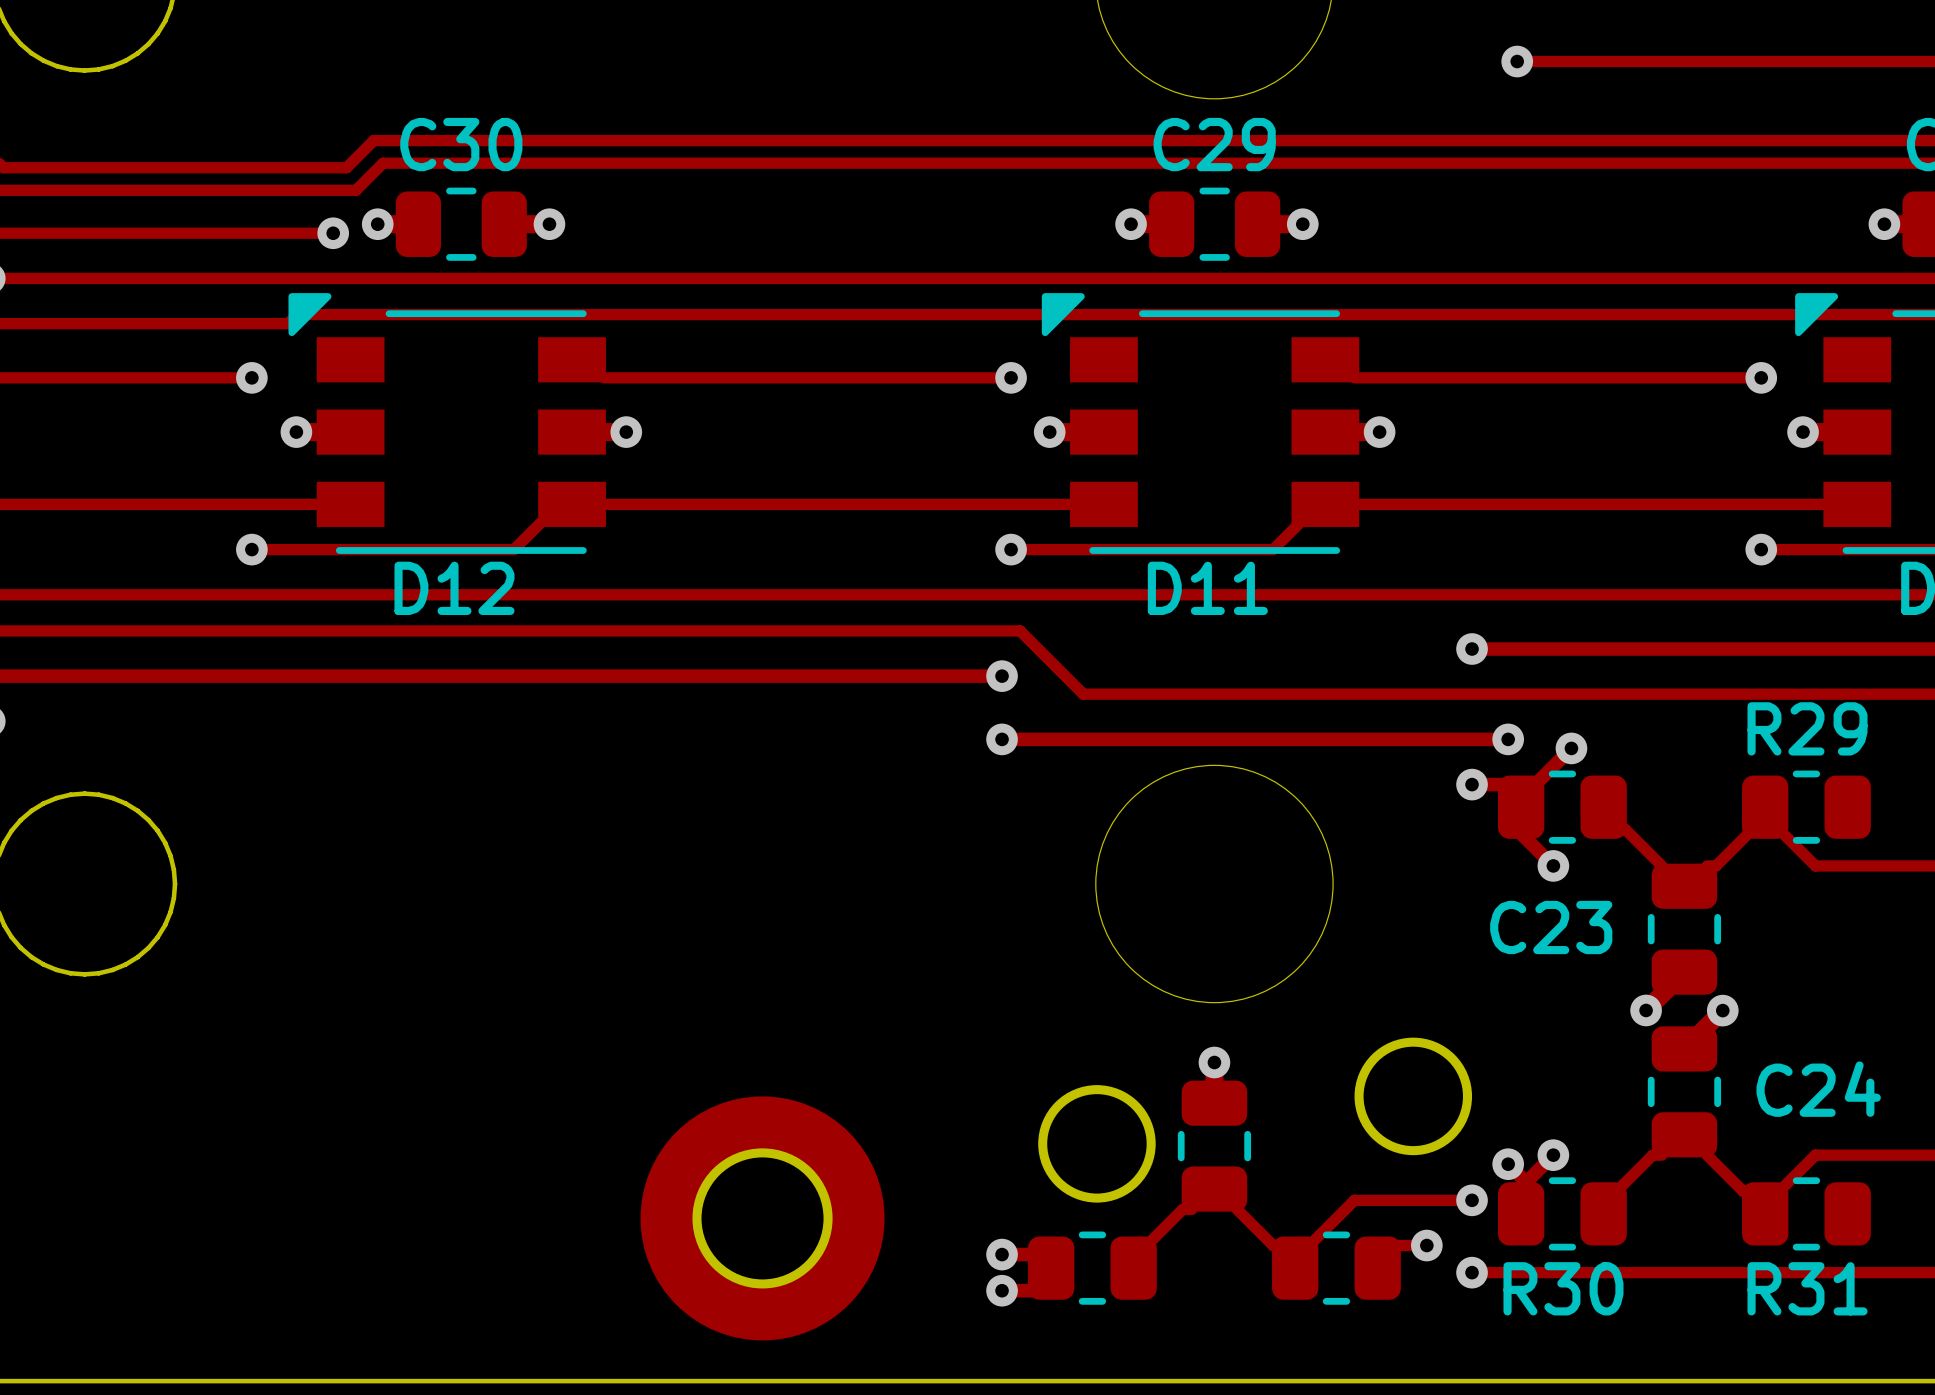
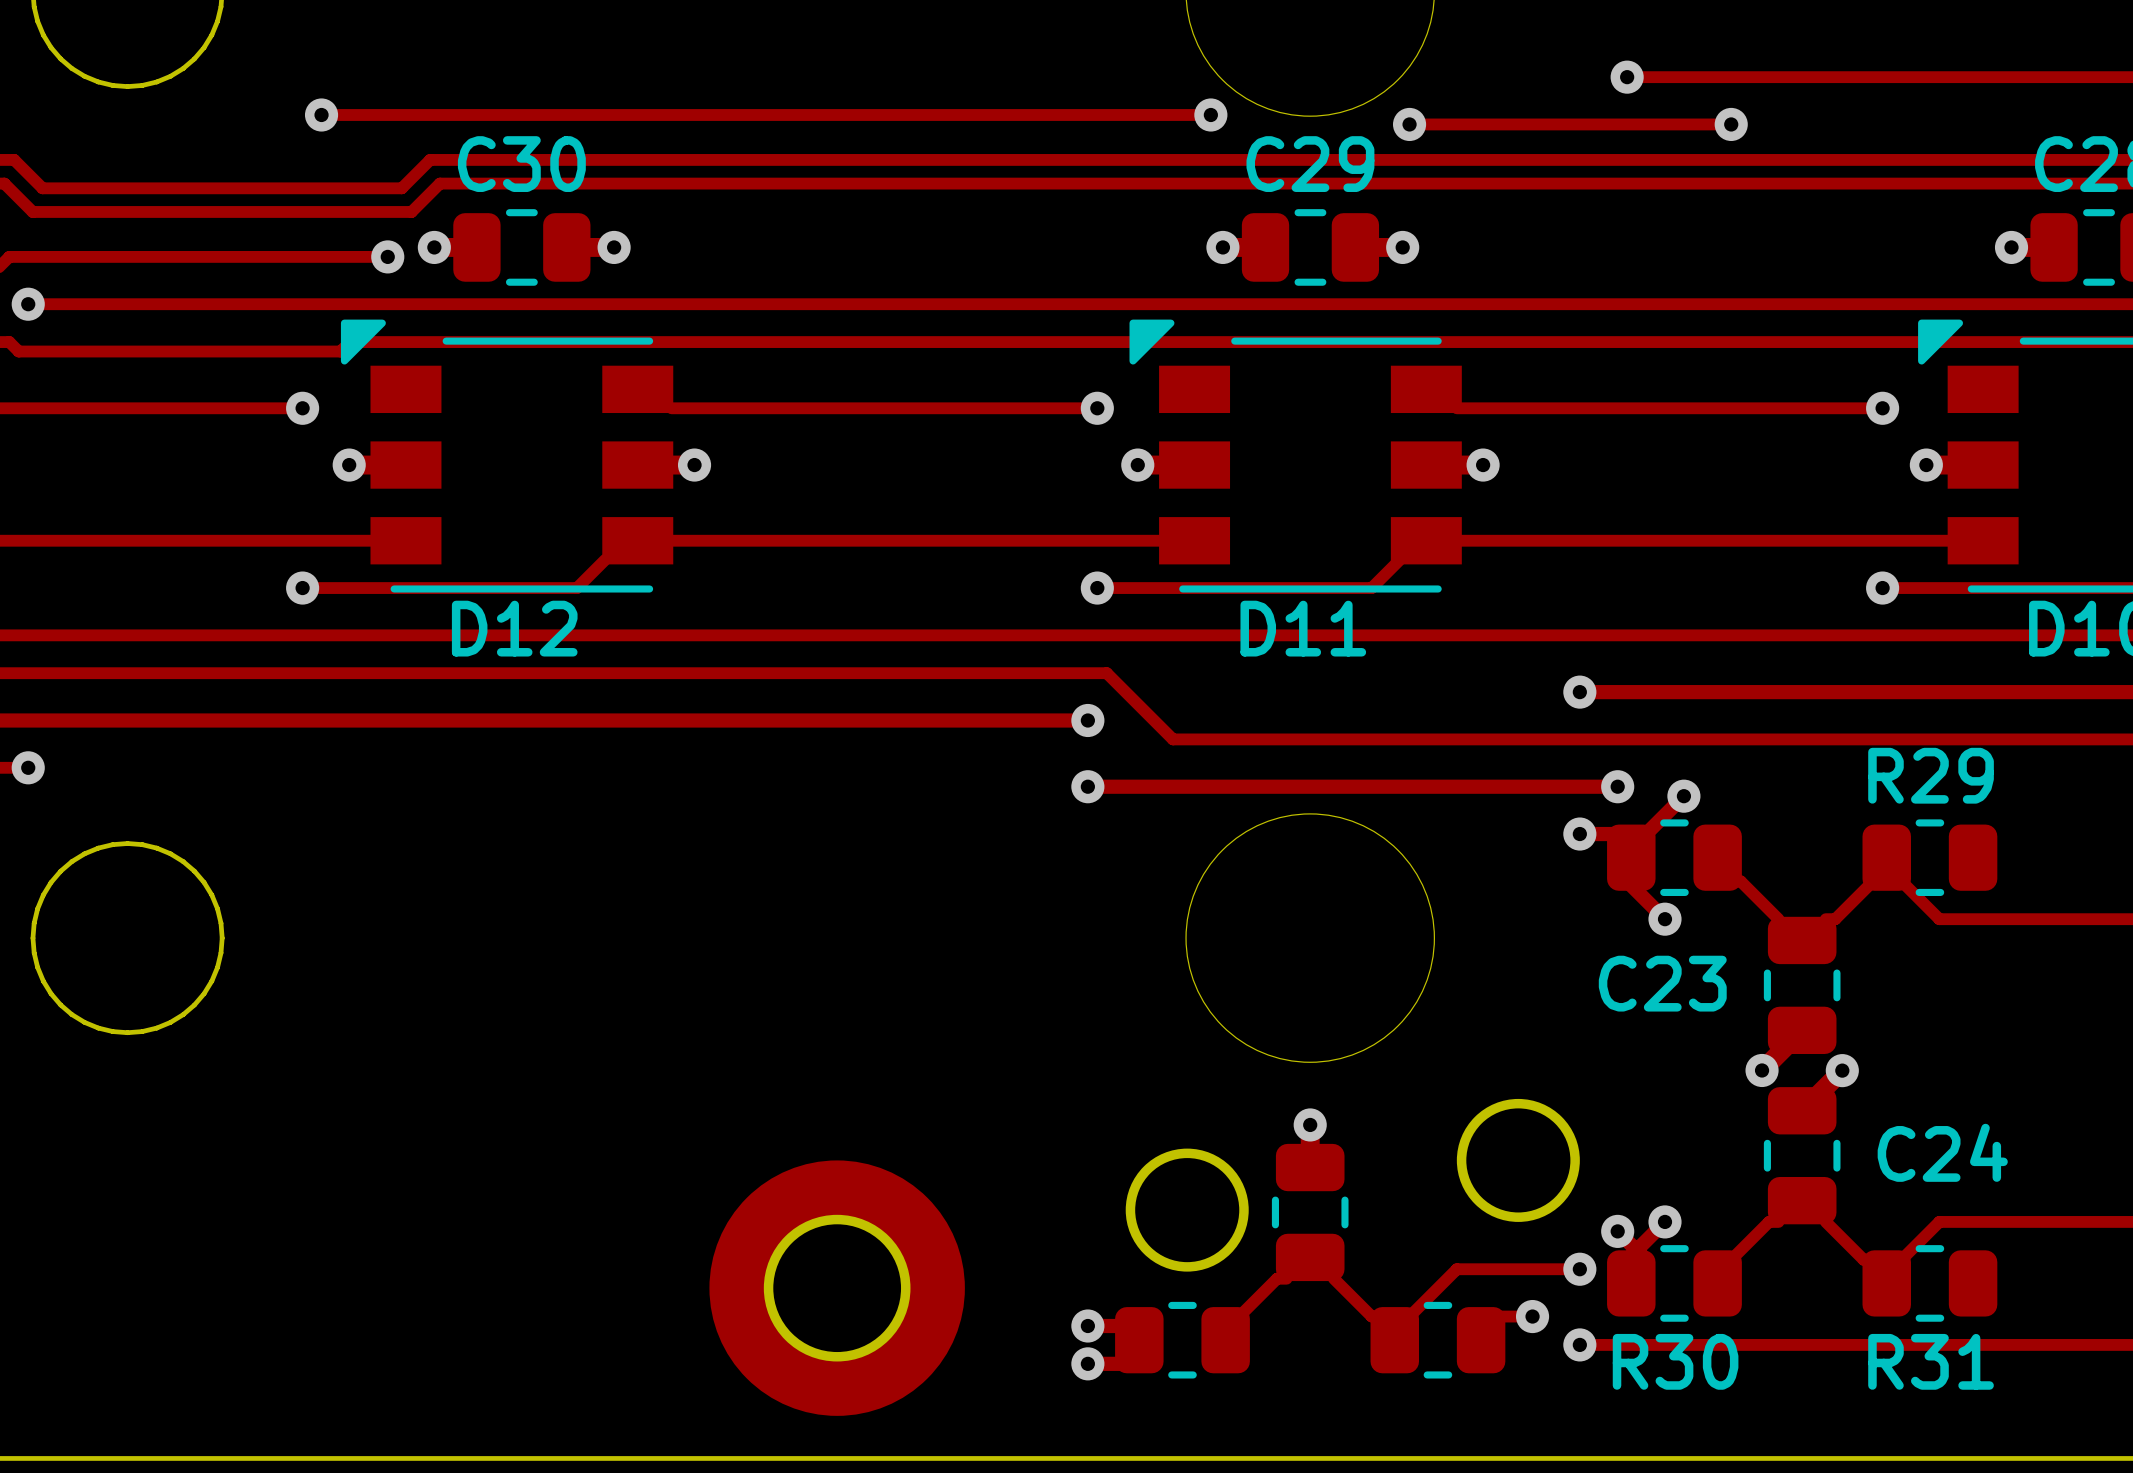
track: none -> (321, 114) (1210, 114)
via: none -> (321, 114)
via: none -> (1210, 114)
track: none -> (1409, 124) (1731, 124)
via: none -> (1409, 124)
via: none -> (1731, 124)

